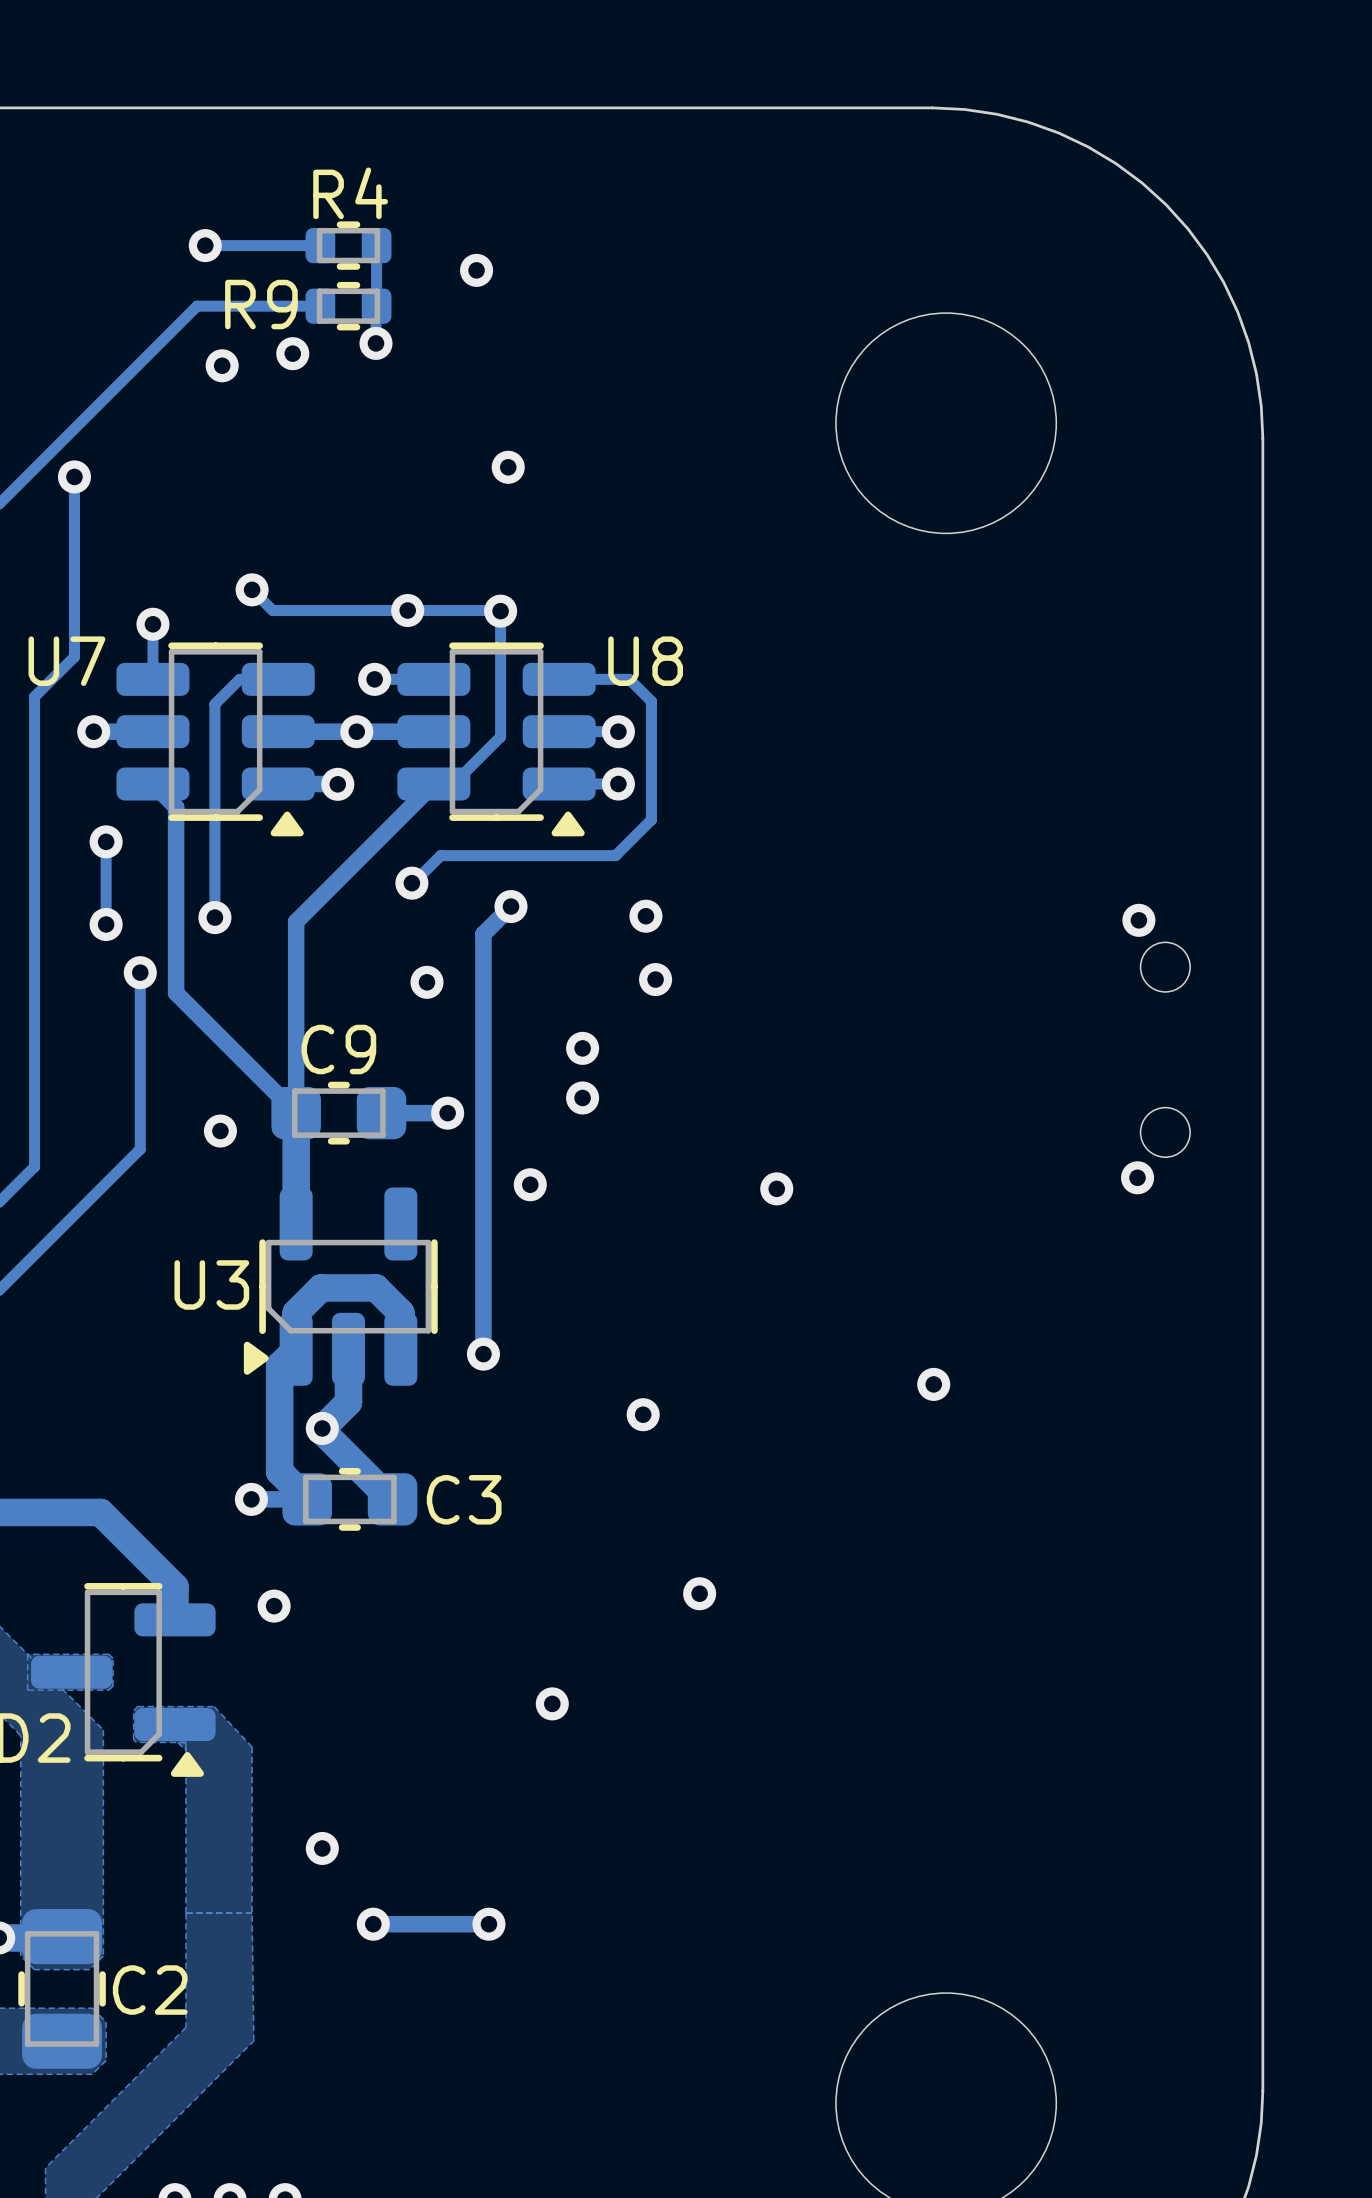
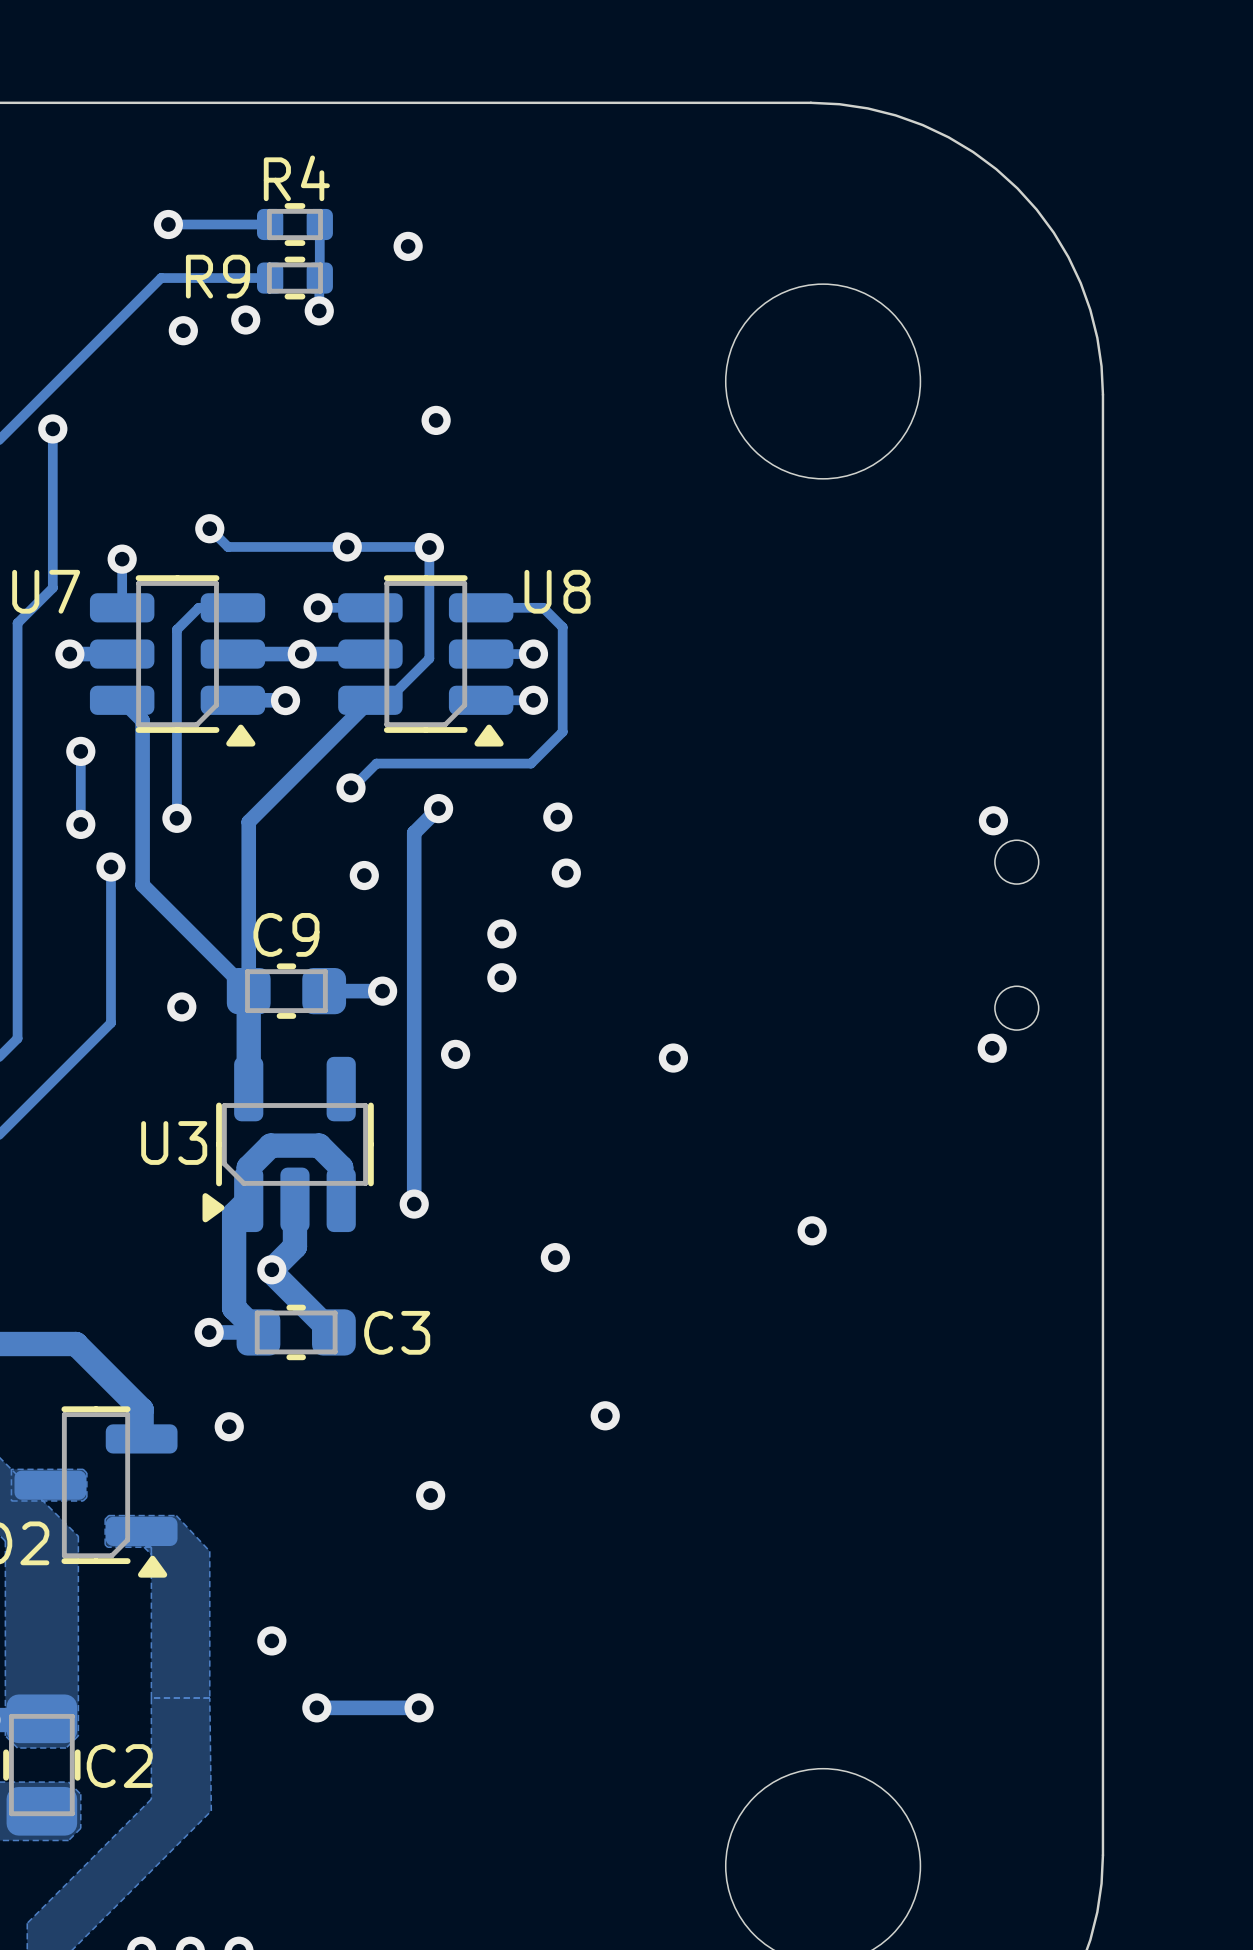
via position: (552, 1703) -> (430, 1495)

